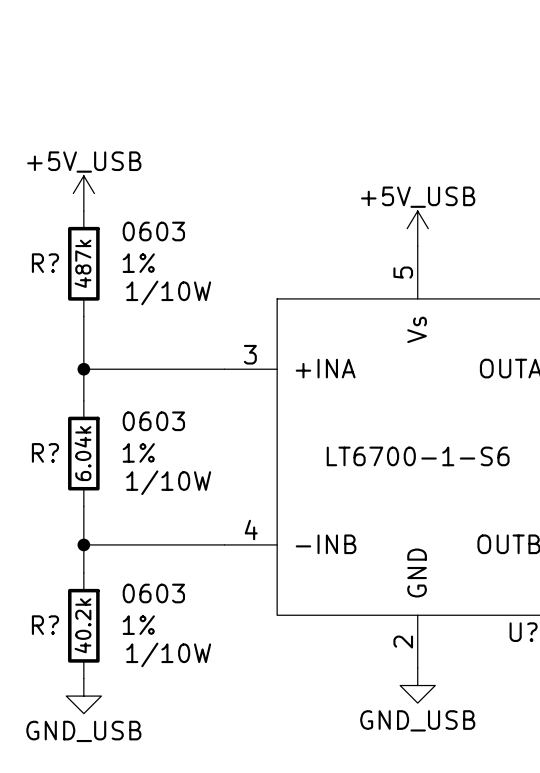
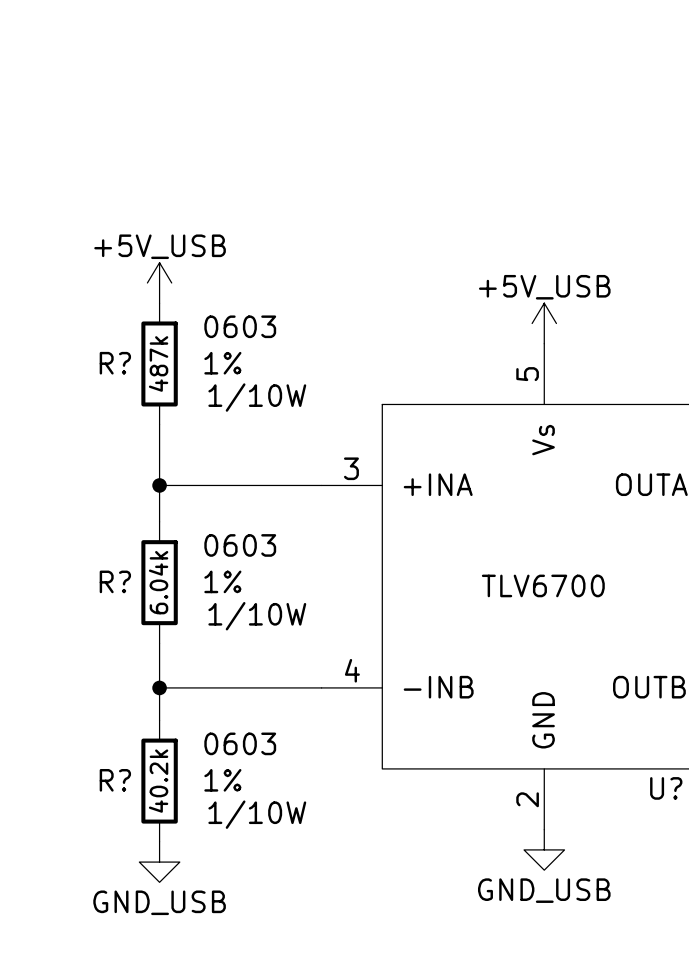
U? value: LT6700-1-S6 (418, 456) -> TLV6700 (543, 585)

